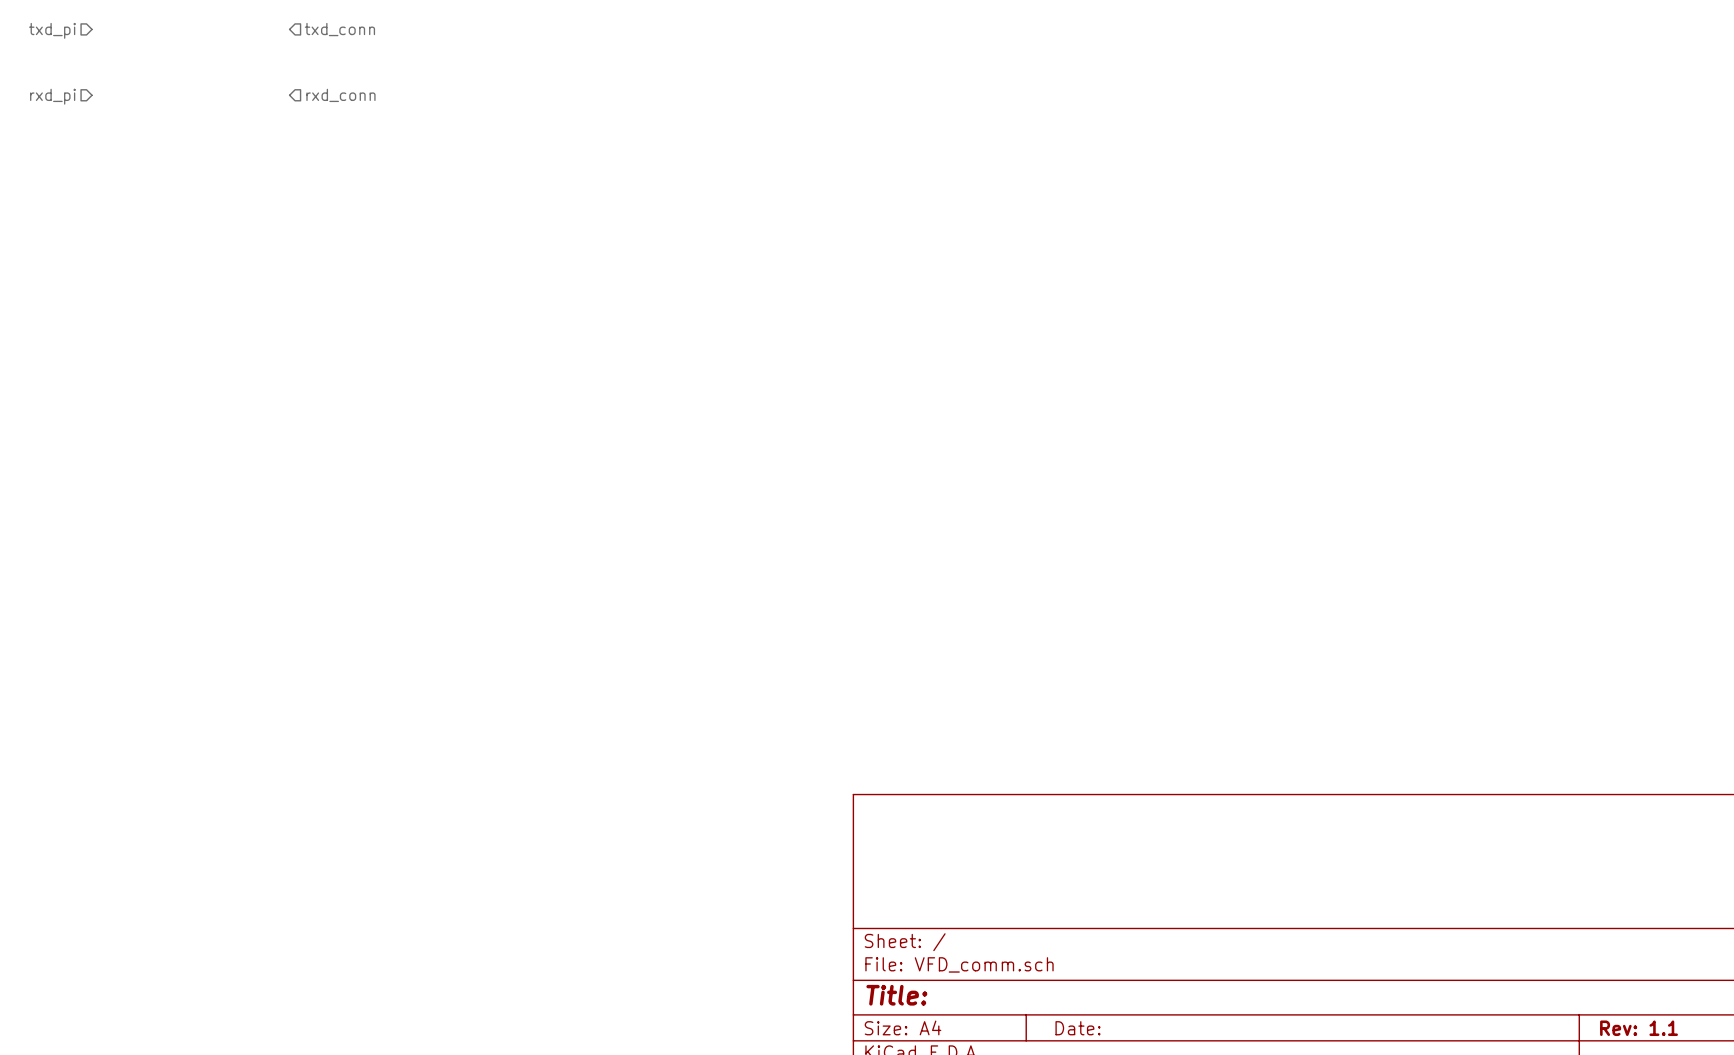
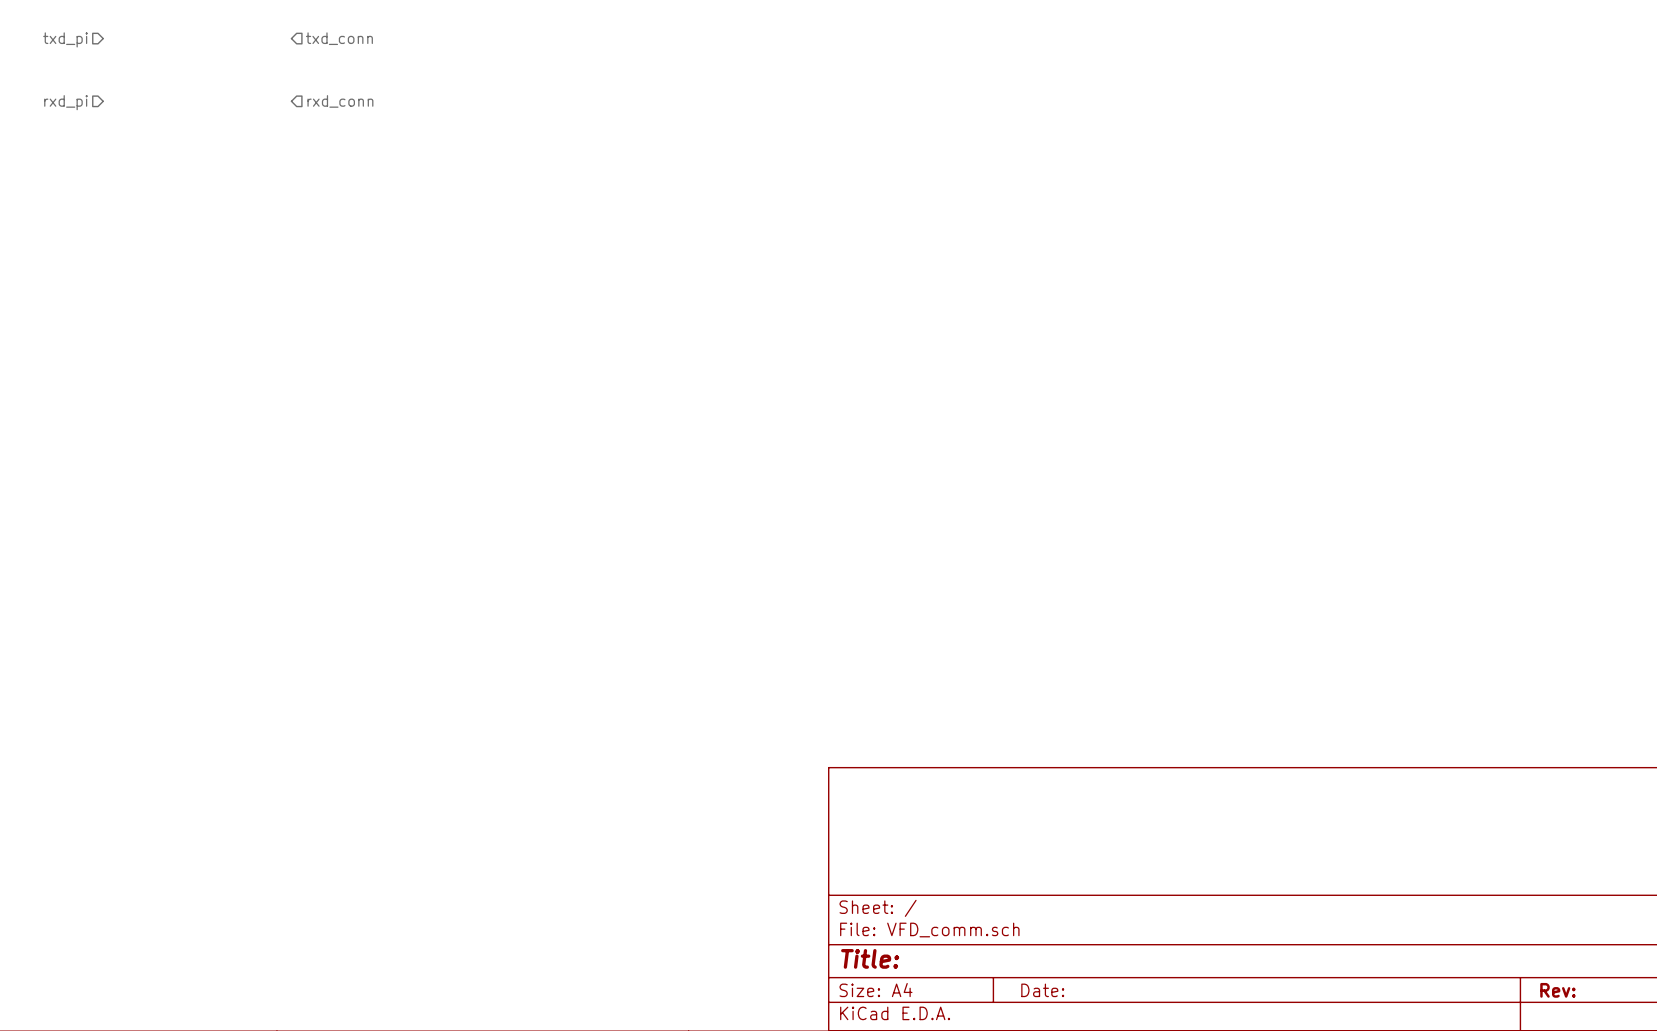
title block: Rev: 1.1 (1639, 1028) -> Rev: (1557, 990)

